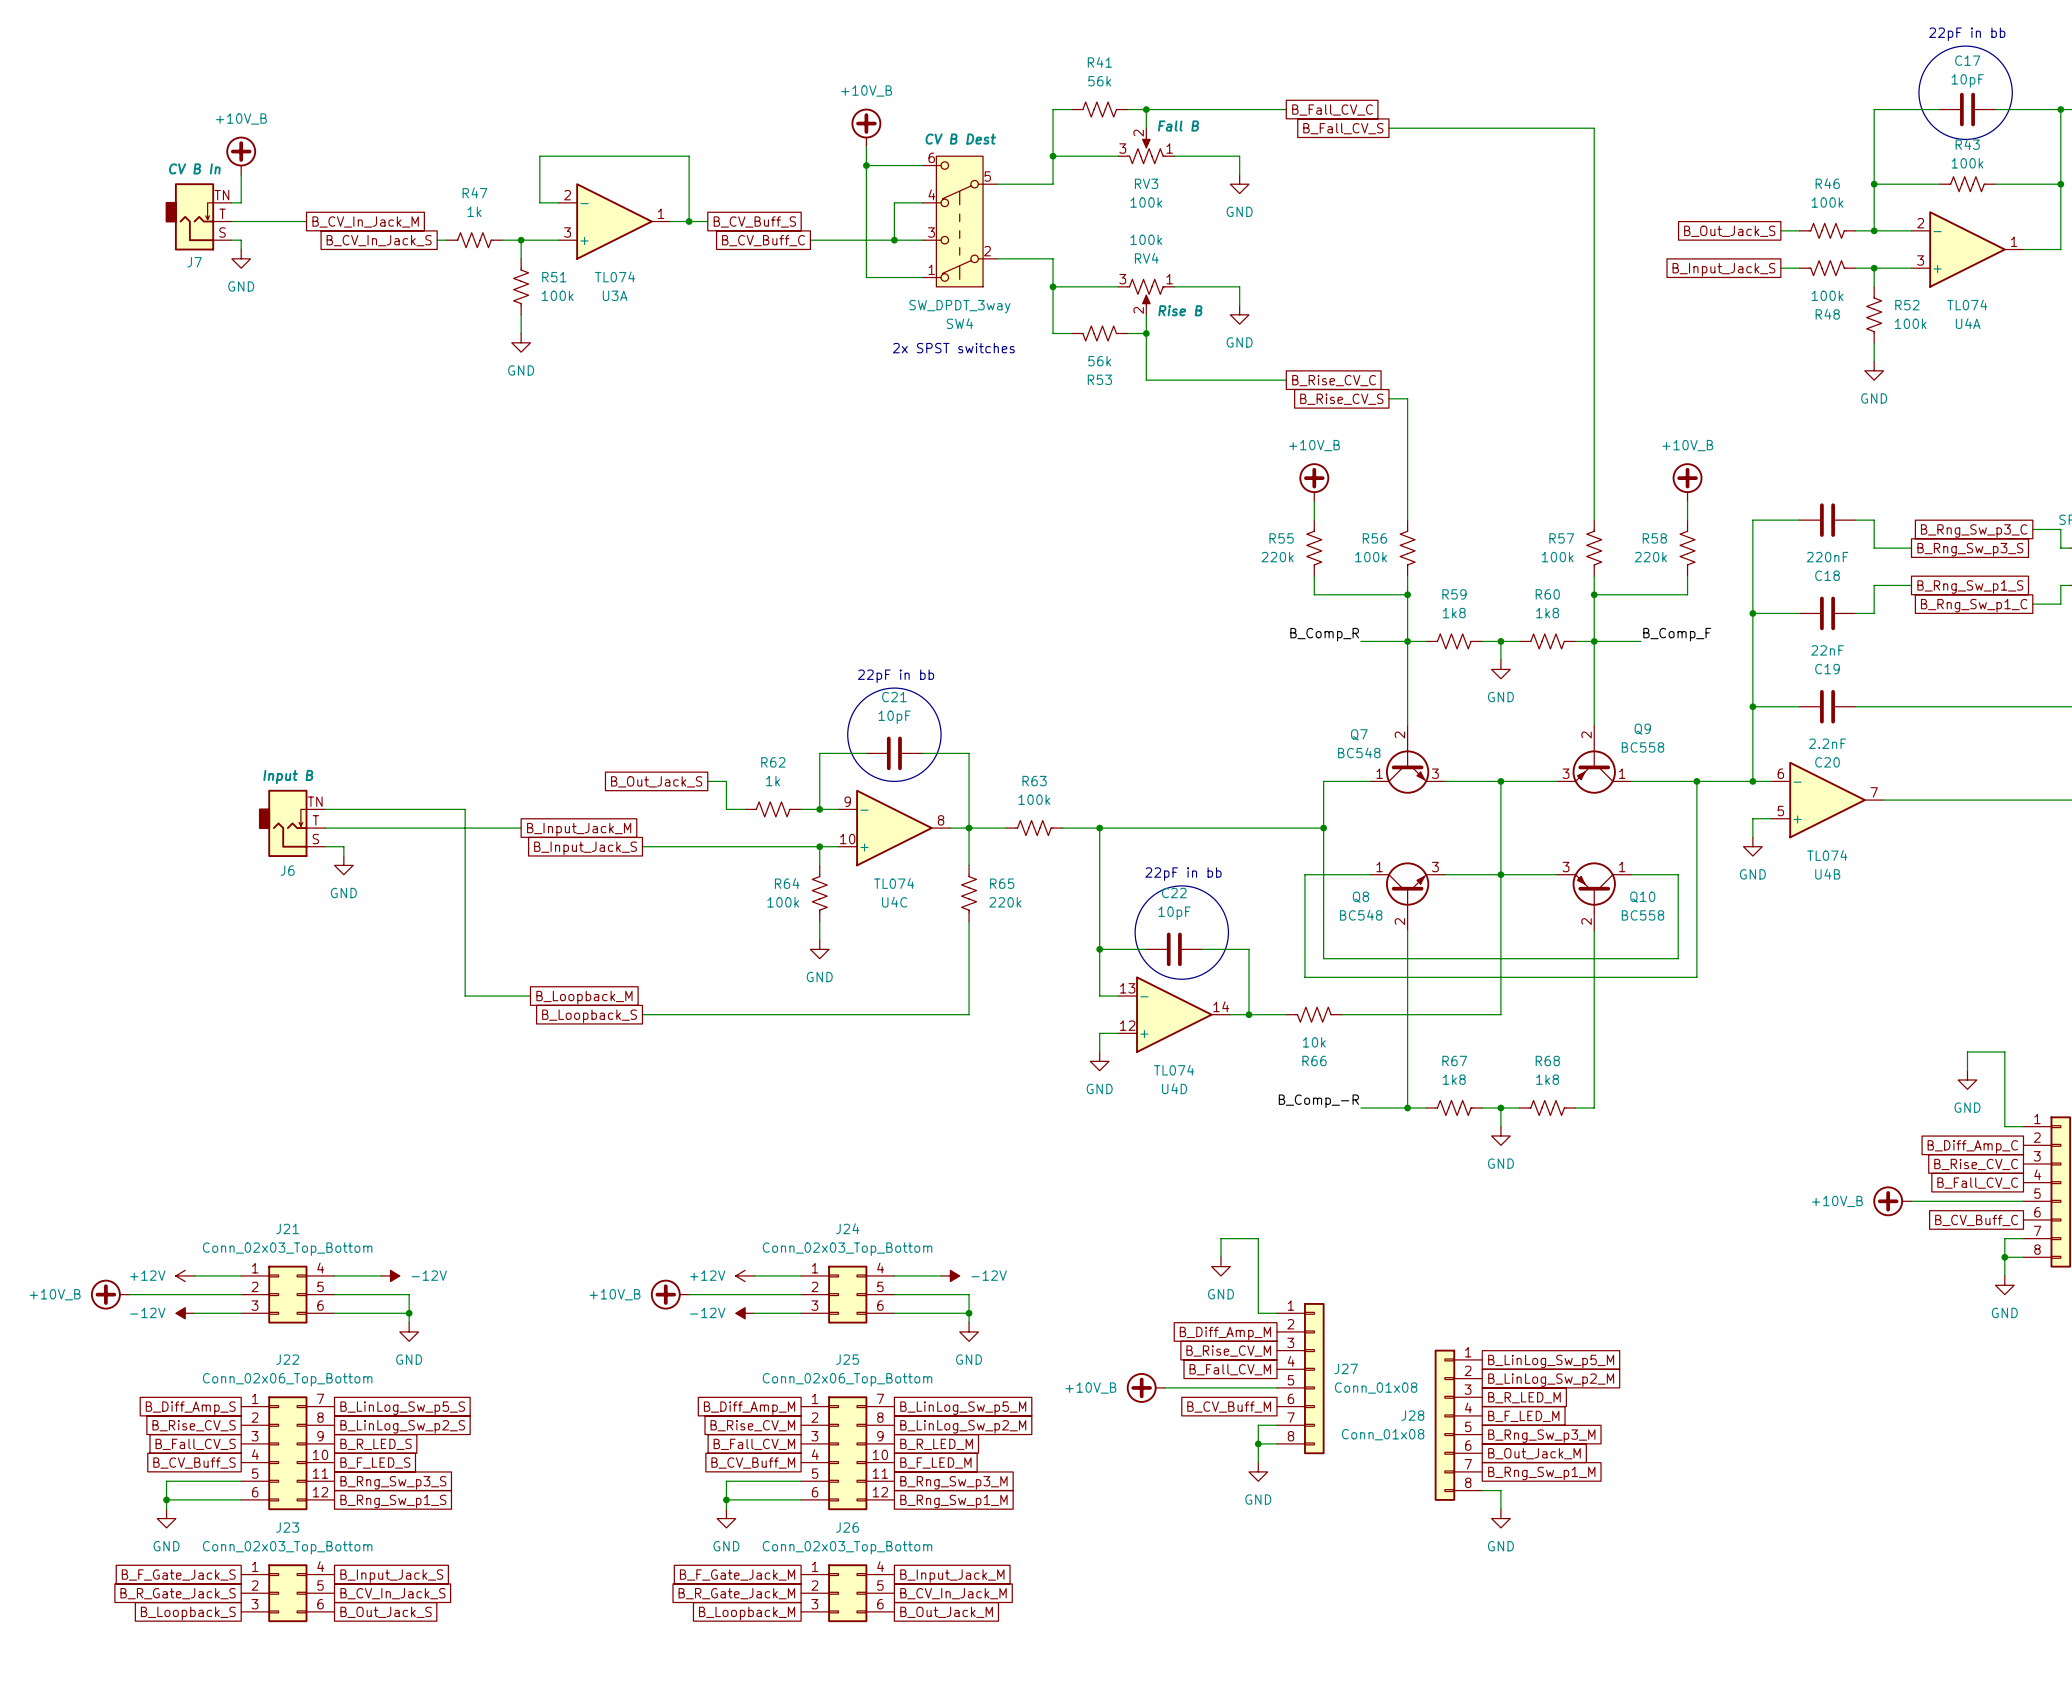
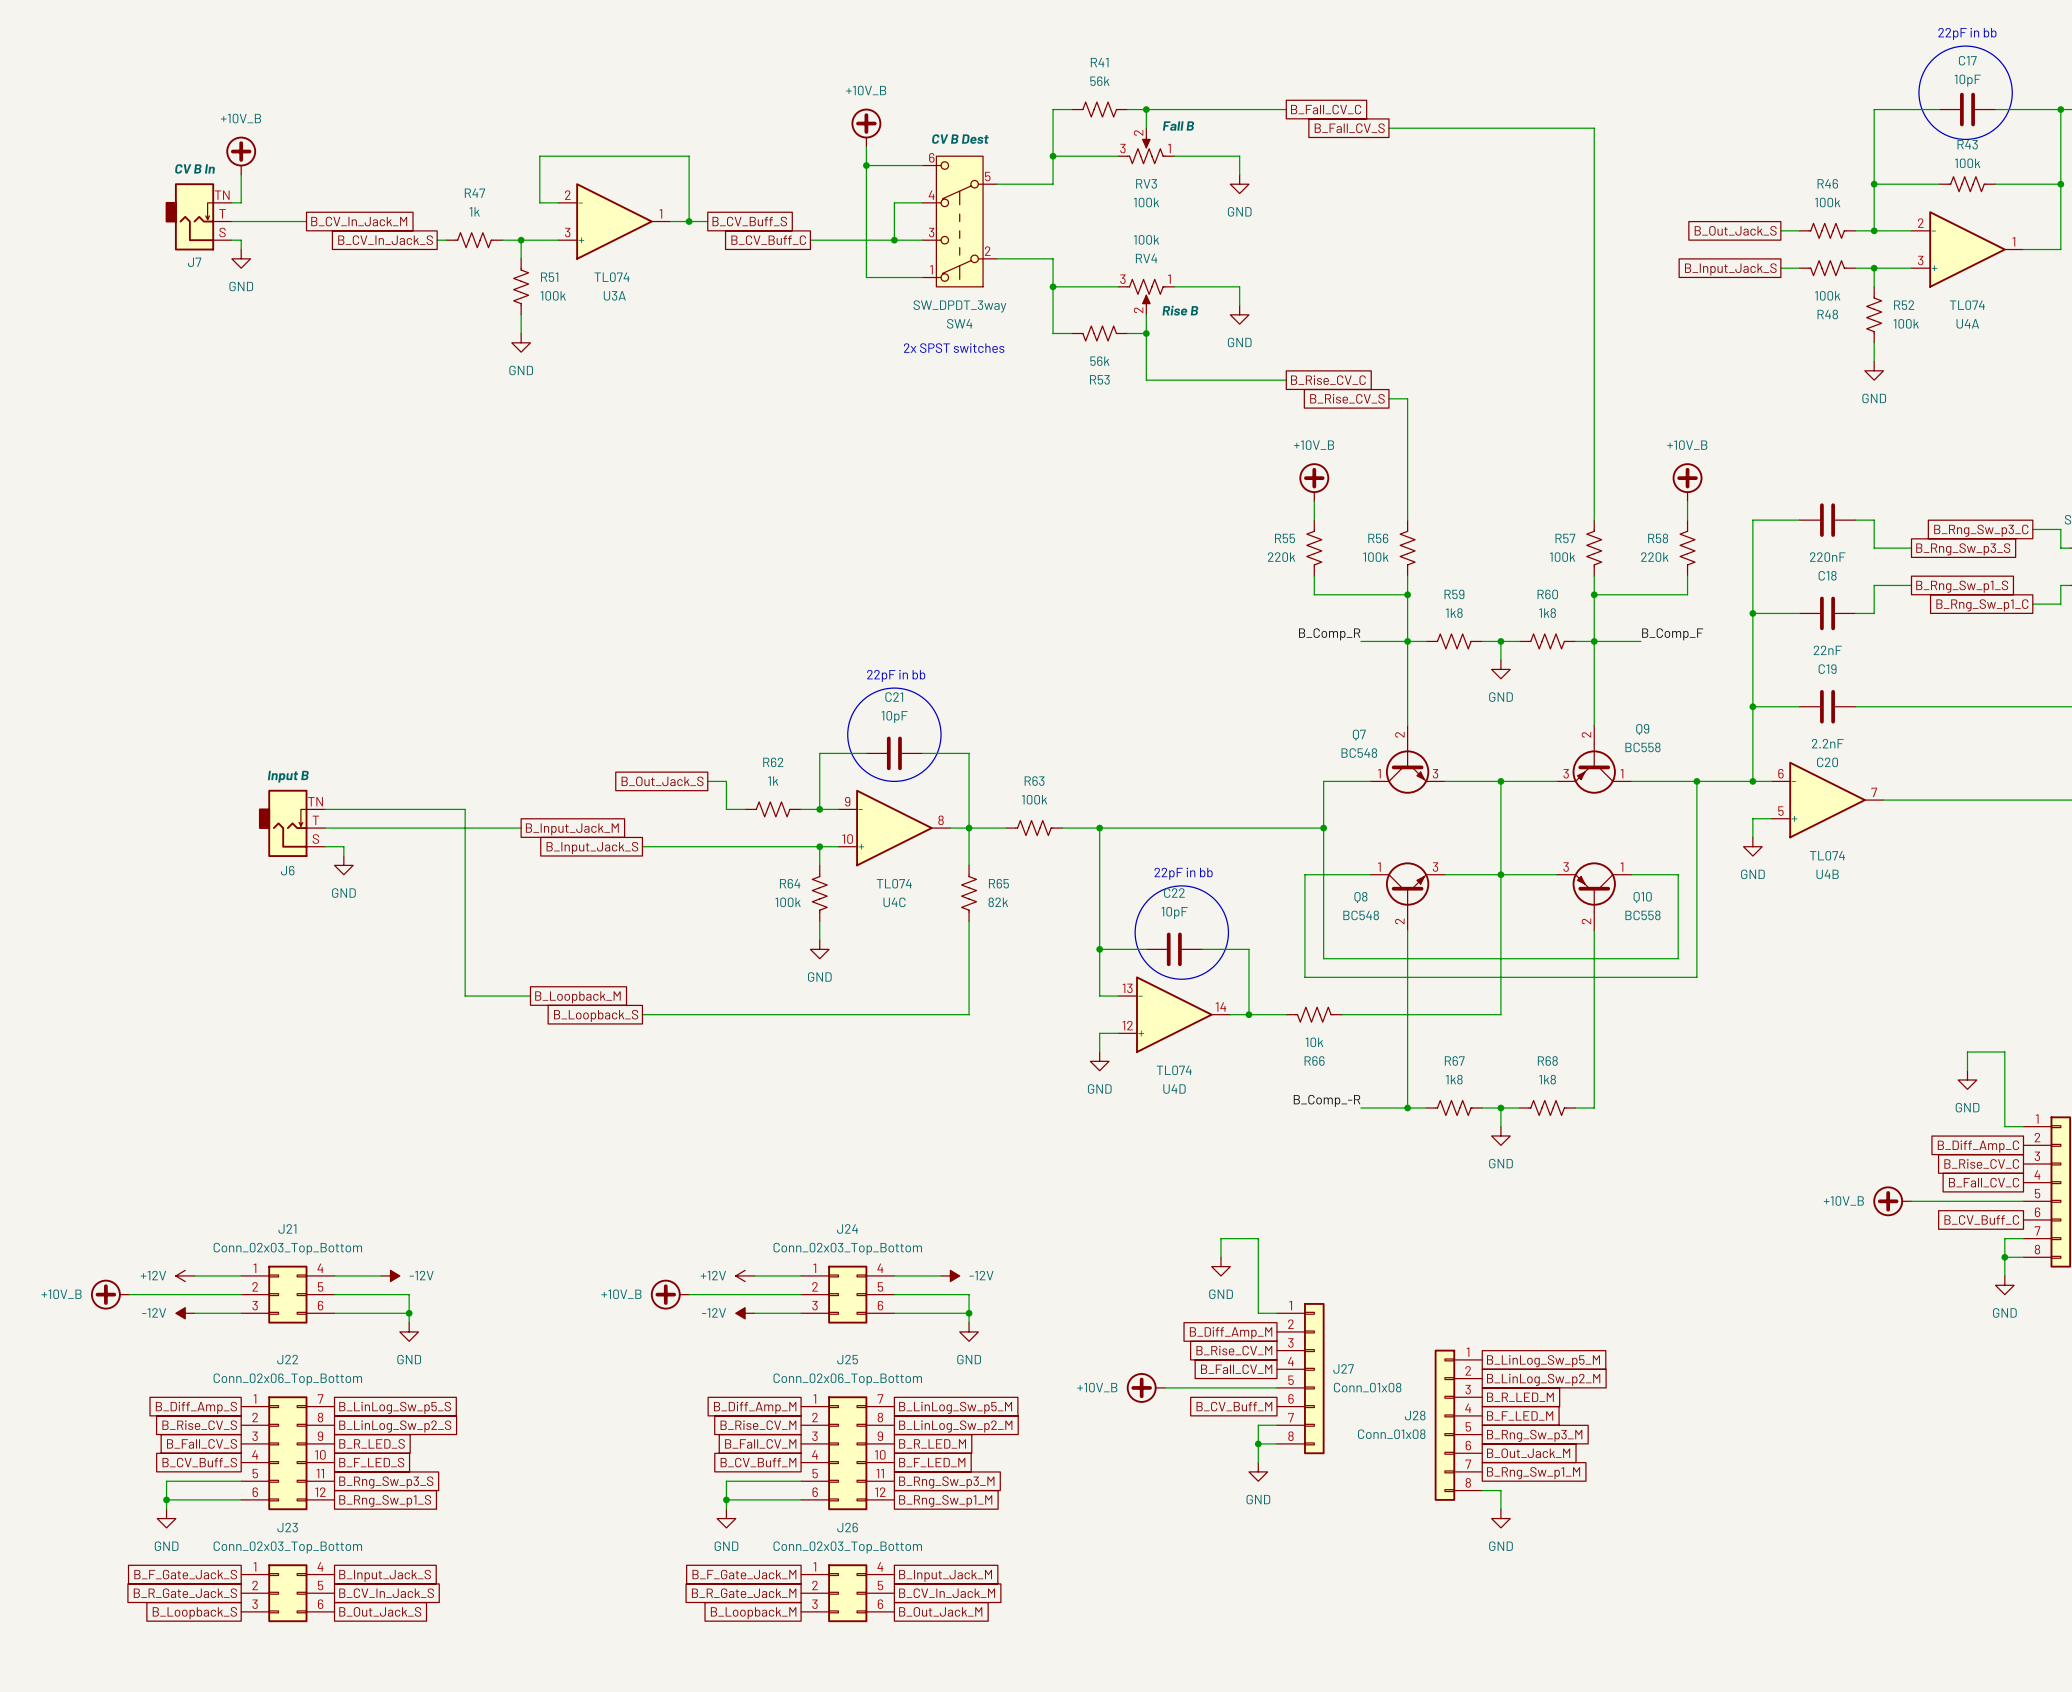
R65 value: 220k (1005, 902) -> 82k (998, 902)

